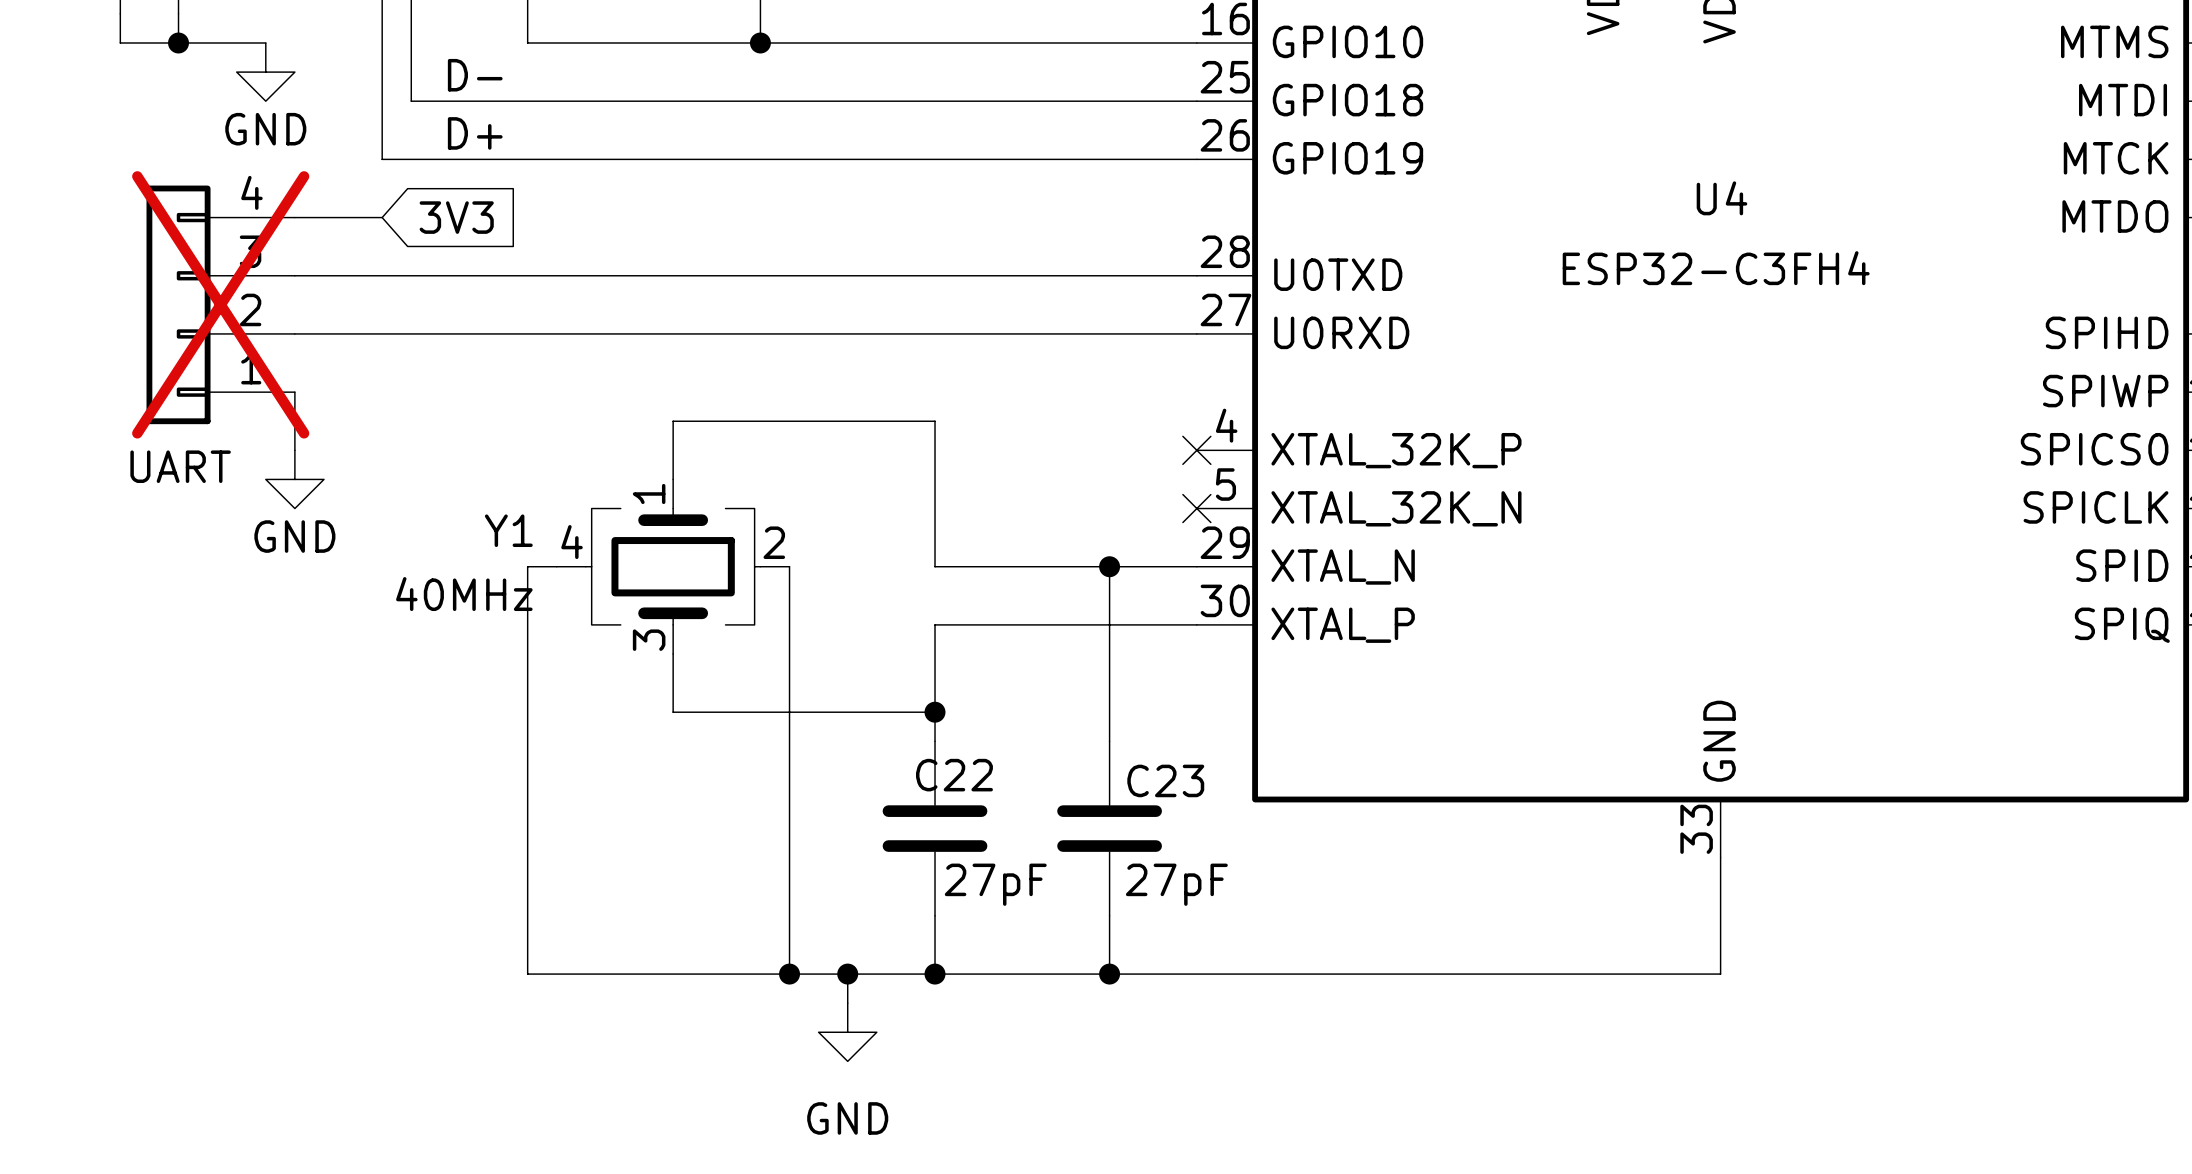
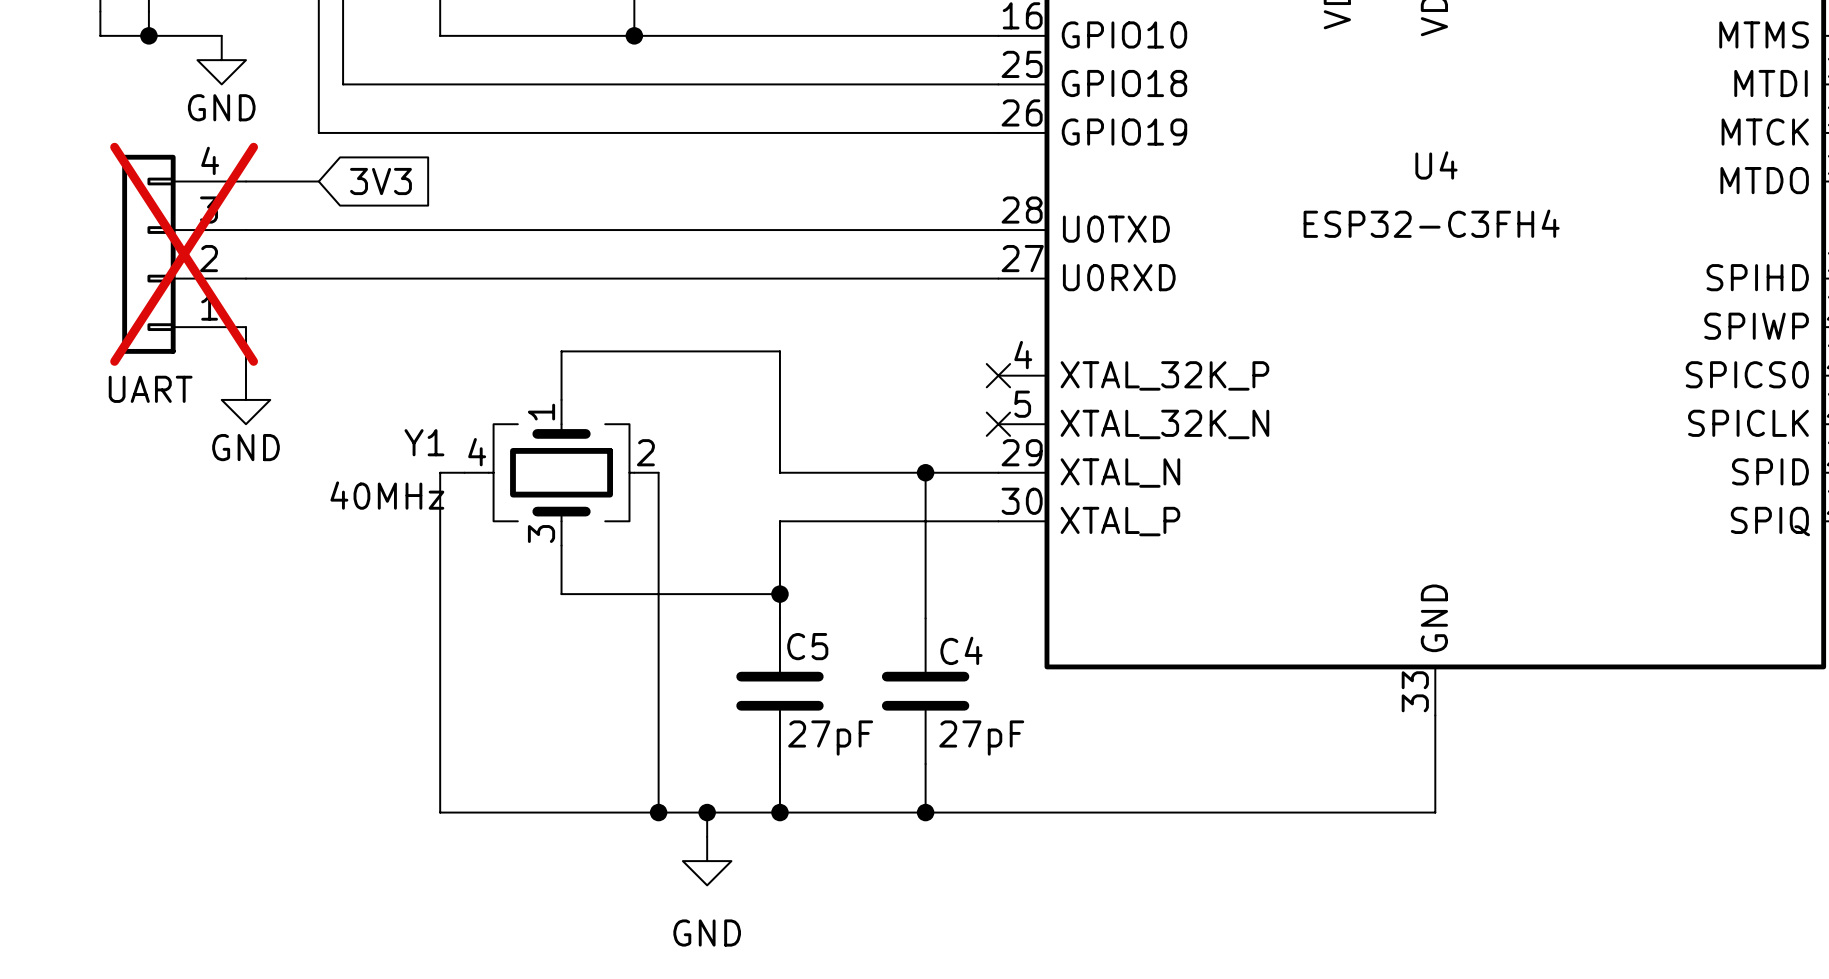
label: D- (475, 75) -> none
label: D+ (475, 133) -> none
C22 name: C22 (954, 775) -> C5 (807, 646)
C23 name: C23 (1165, 780) -> C4 (961, 650)

